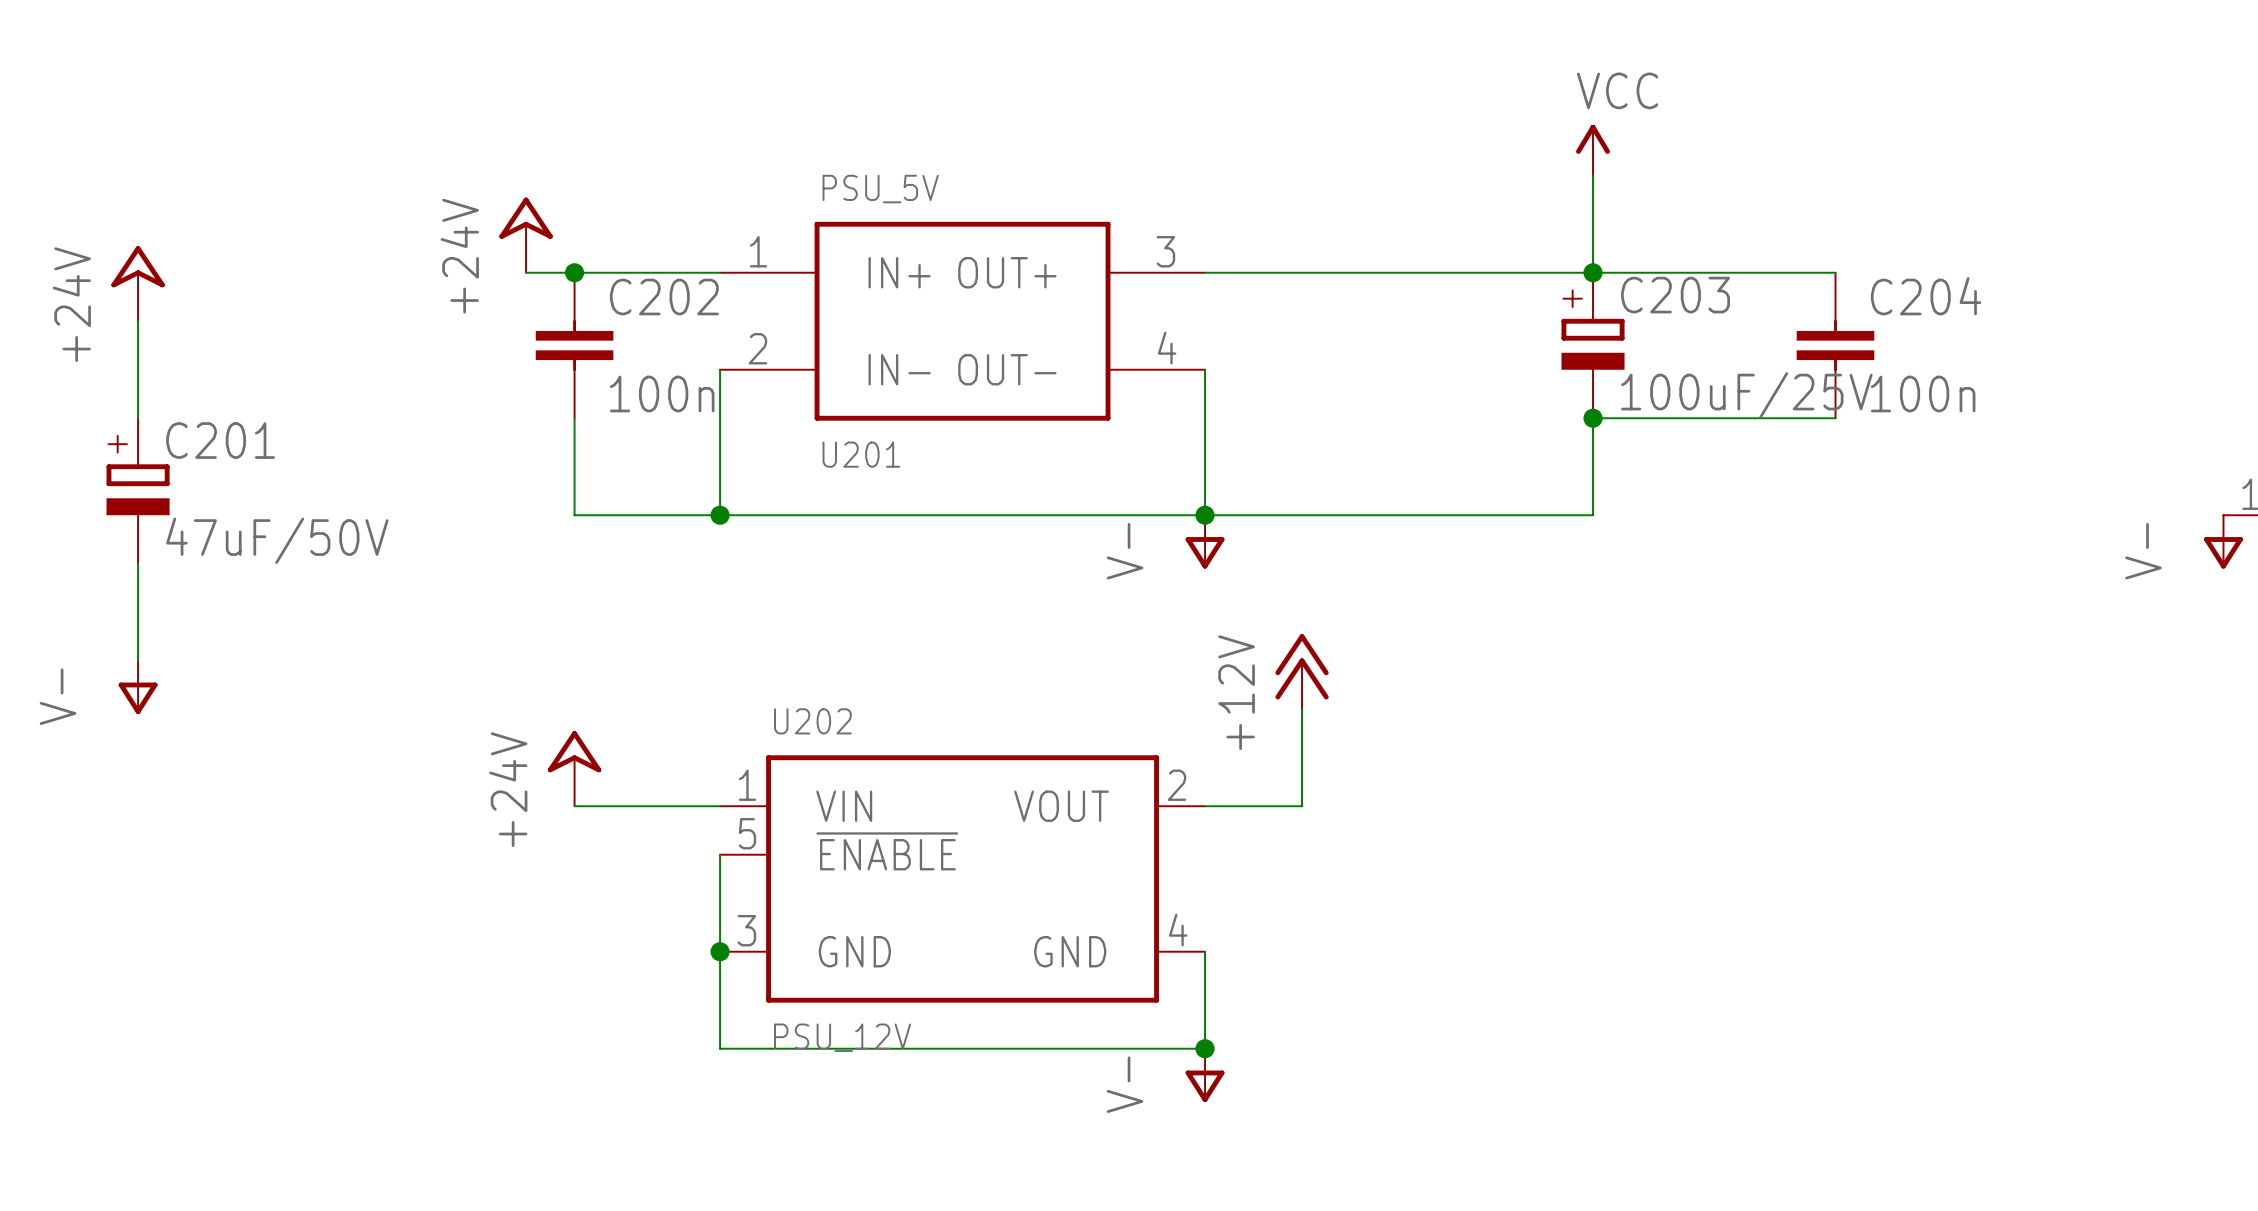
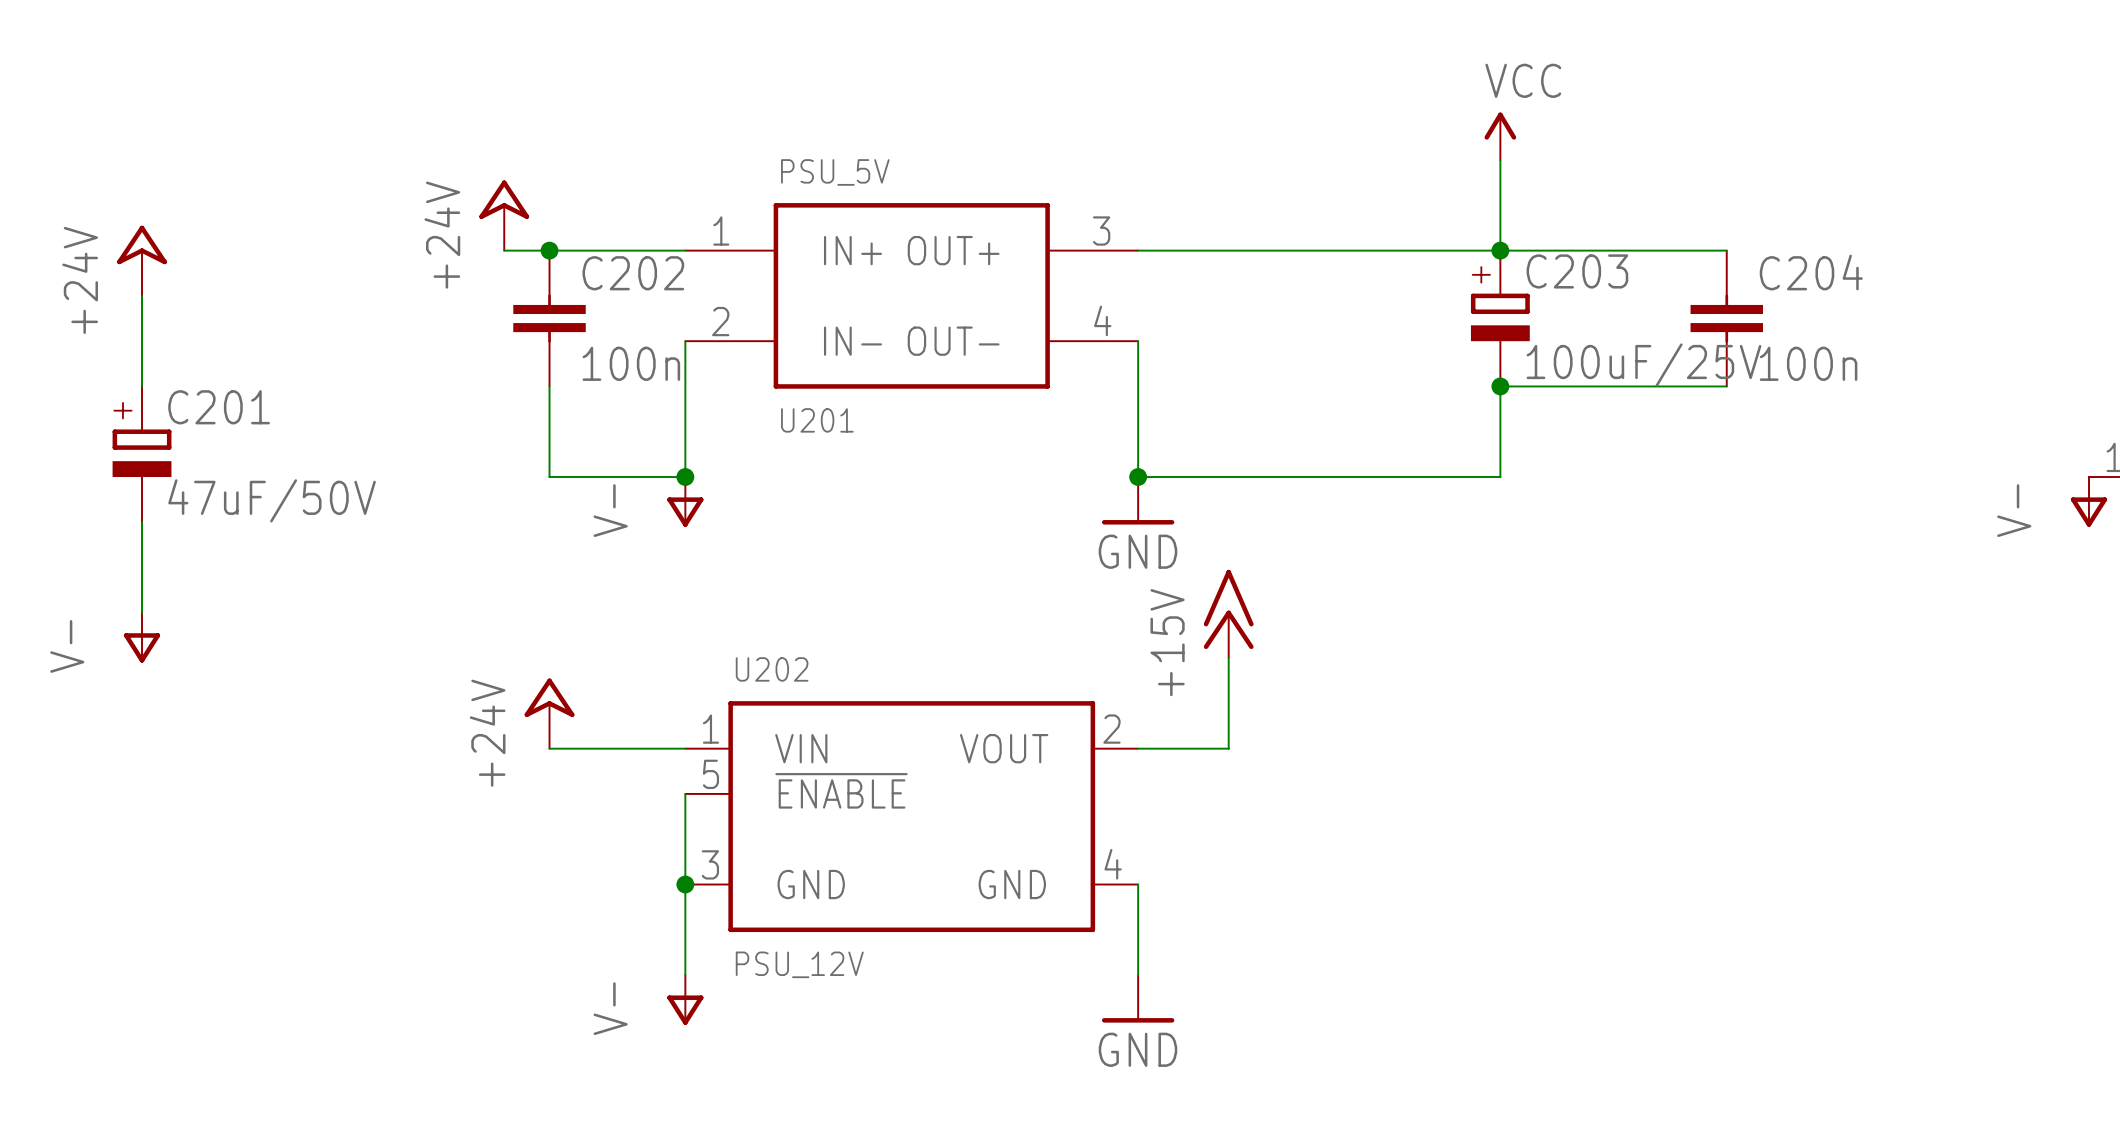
wire: (720, 515) (1205, 515) -> none
power symbol: none -> V- (685, 501)
power symbol: V- (1205, 541) -> GND (1138, 500)
power symbol: +12V (1302, 671) -> +15V (1228, 613)
wire: (720, 1048) (1205, 1048) -> none
junction: (1205, 1048) -> none
power symbol: none -> V- (685, 999)
power symbol: V- (1205, 1075) -> GND (1138, 998)

